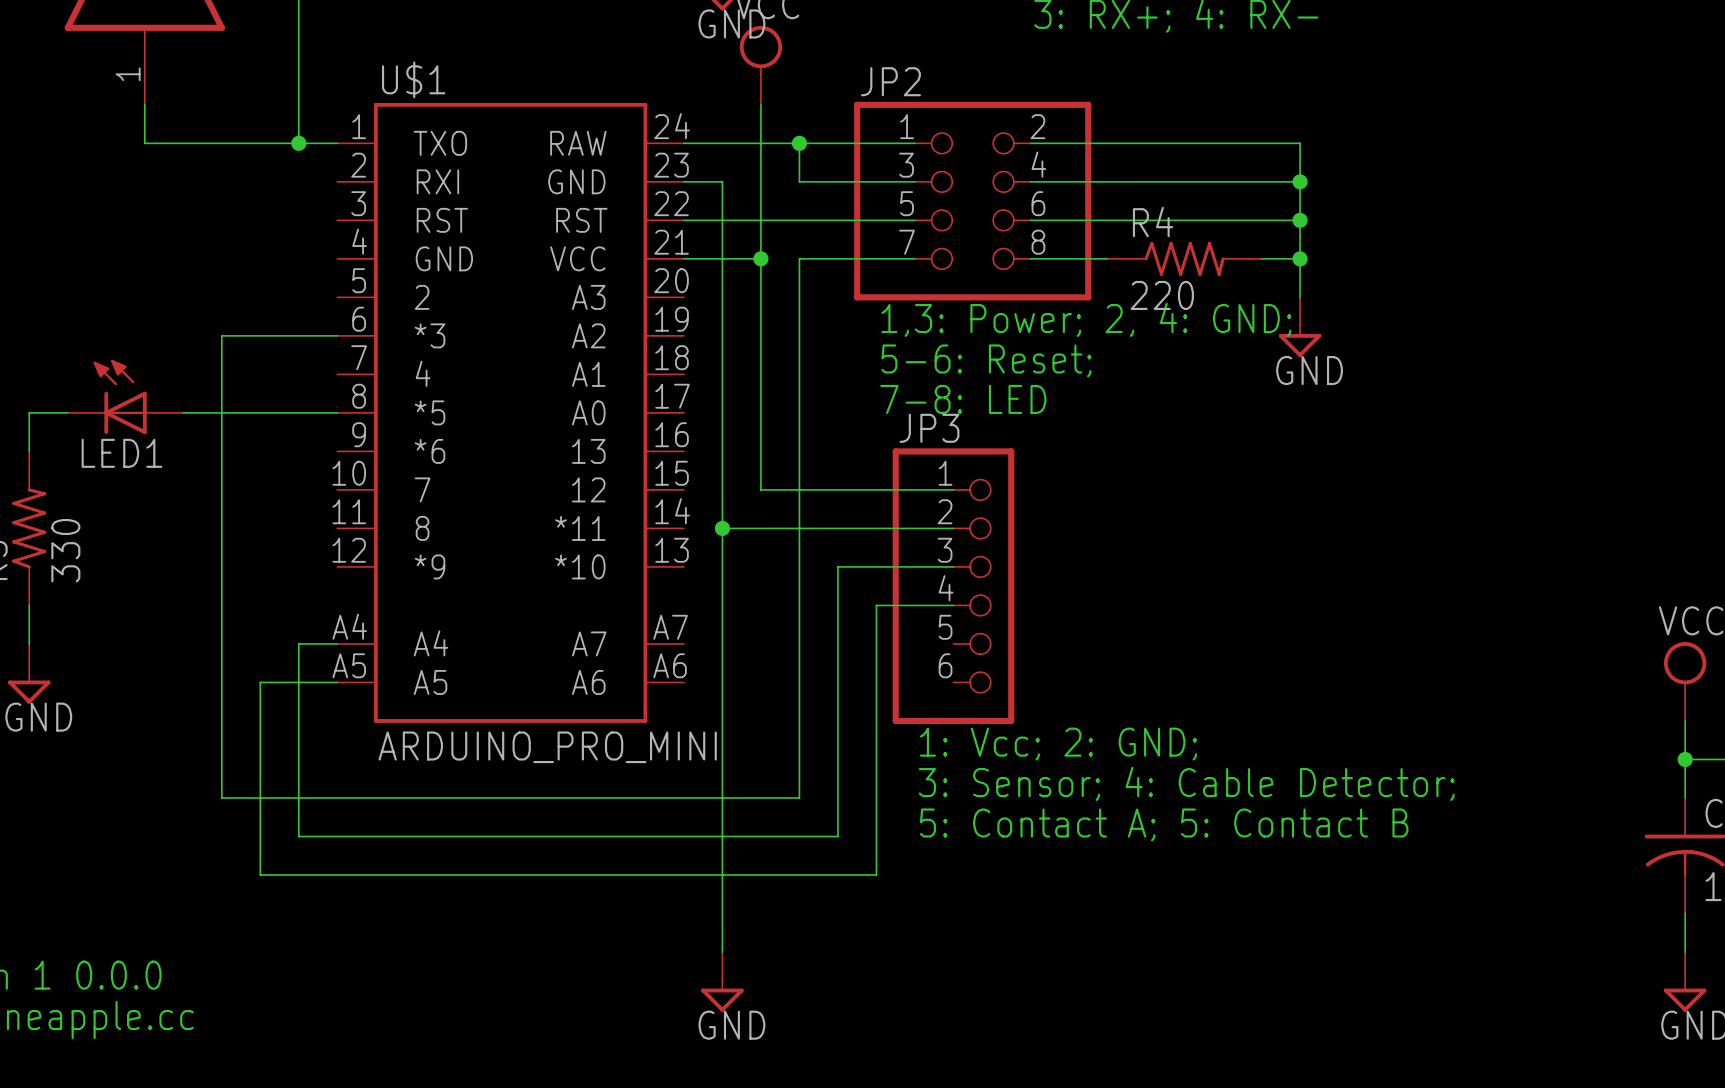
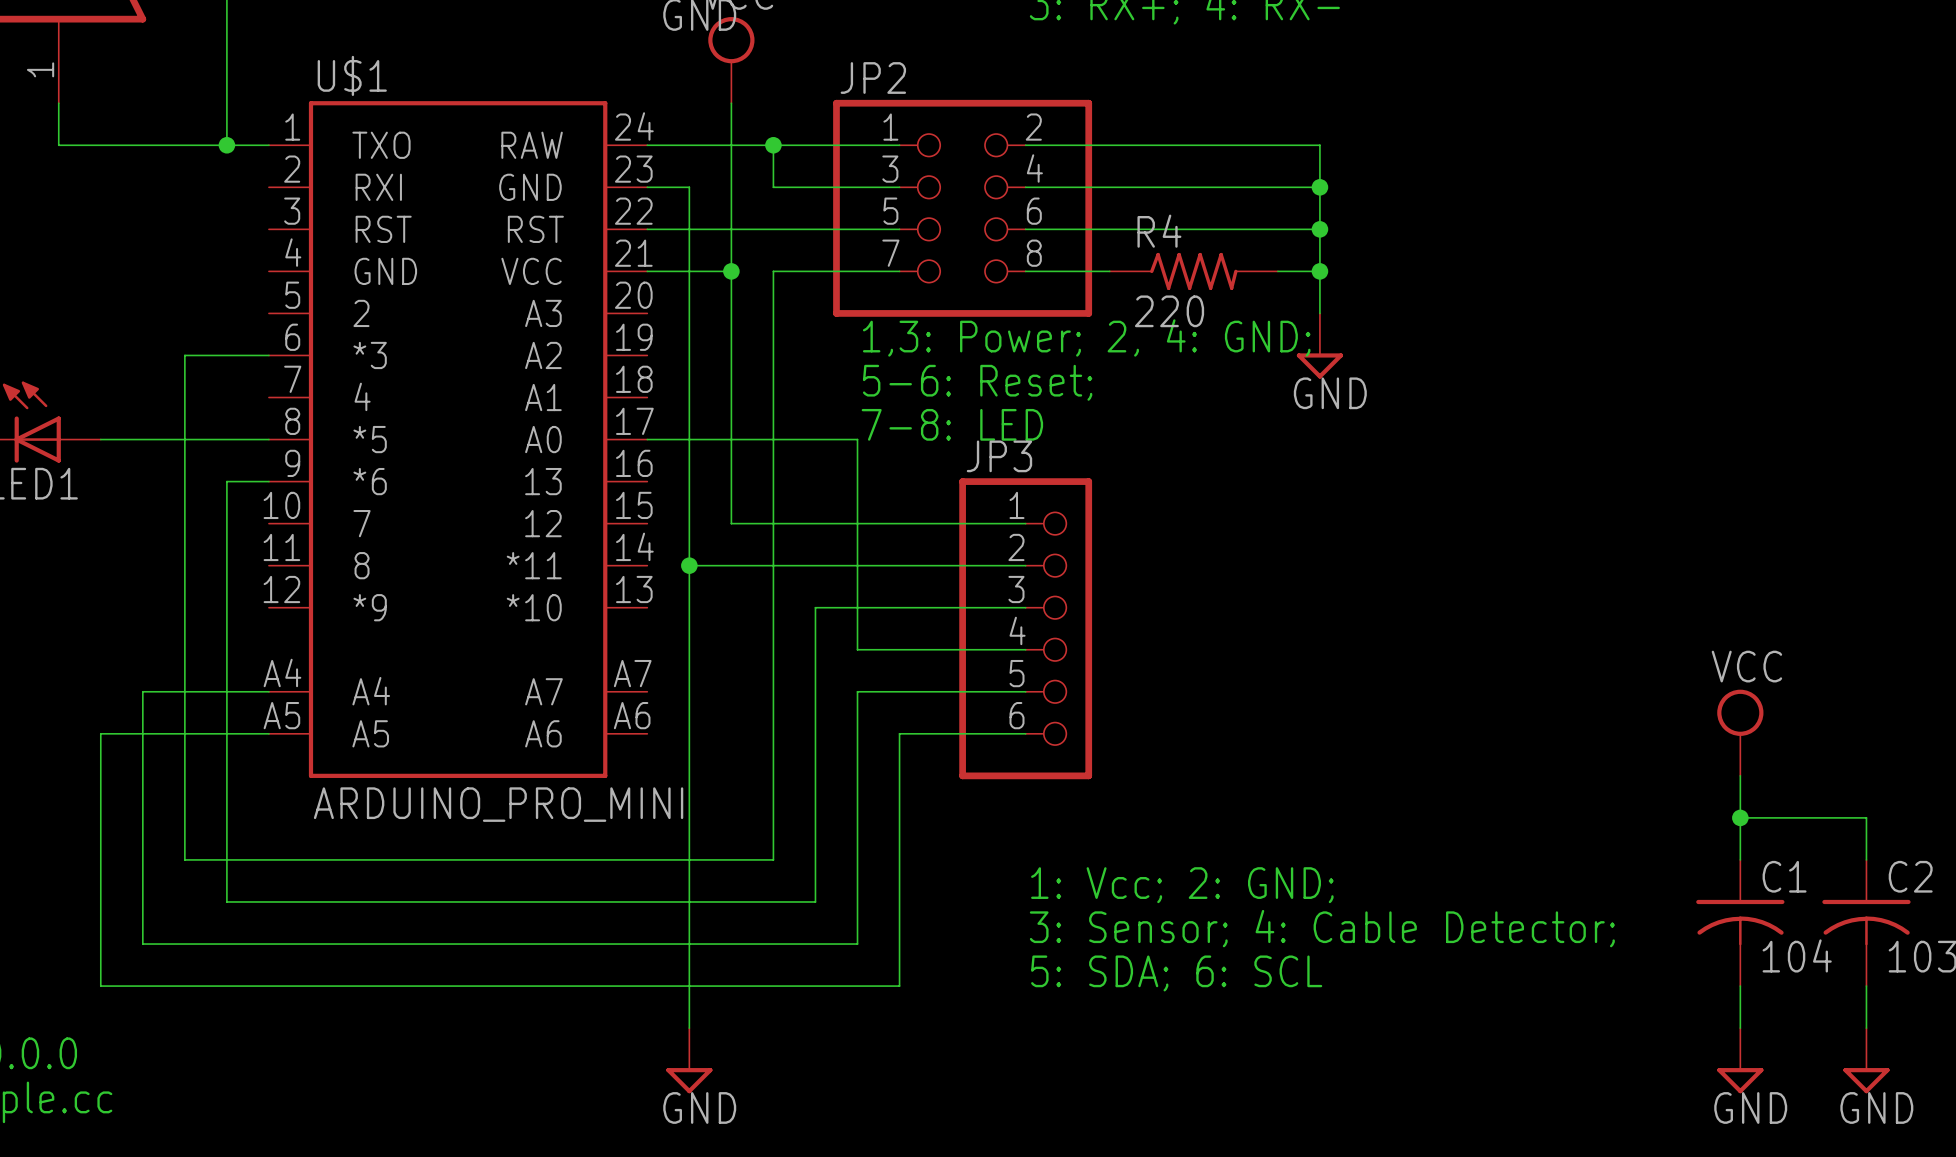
wire: (260, 335) (221, 335) (221, 643) -> (268, 481) (226, 481) (226, 691) (142, 691)
wire: none -> (184, 355) (184, 733) (100, 733) (100, 986) (899, 986) (899, 733) (1025, 733)
wire: none -> (647, 439) (857, 439) (857, 649)
wire: none -> (941, 523) (1025, 523)
wire: none -> (941, 565) (1025, 565)
wire: none -> (941, 607) (1025, 607)
JP3 position: (953, 586) -> (1025, 628)
wire: (876, 605) (876, 643) -> (1025, 691) (857, 691)
wire: none -> (941, 649) (1025, 649)
text position: 1: Vcc; 2: GND; (1058, 744) -> 1: Vcc; 2: GND; (1182, 885)
text position: 3: Sensor; 4: Cable Detector; (1186, 783) -> 3: Sensor; 4: Cable Detector; (1322, 928)
wire: (221, 797) (260, 797) (260, 875) -> (142, 859) (142, 944) (184, 944)
text: 5: Contact A; 5: Contact B (1164, 824) -> none
text: none -> 5: SDA; 6: SCL (1176, 973)

